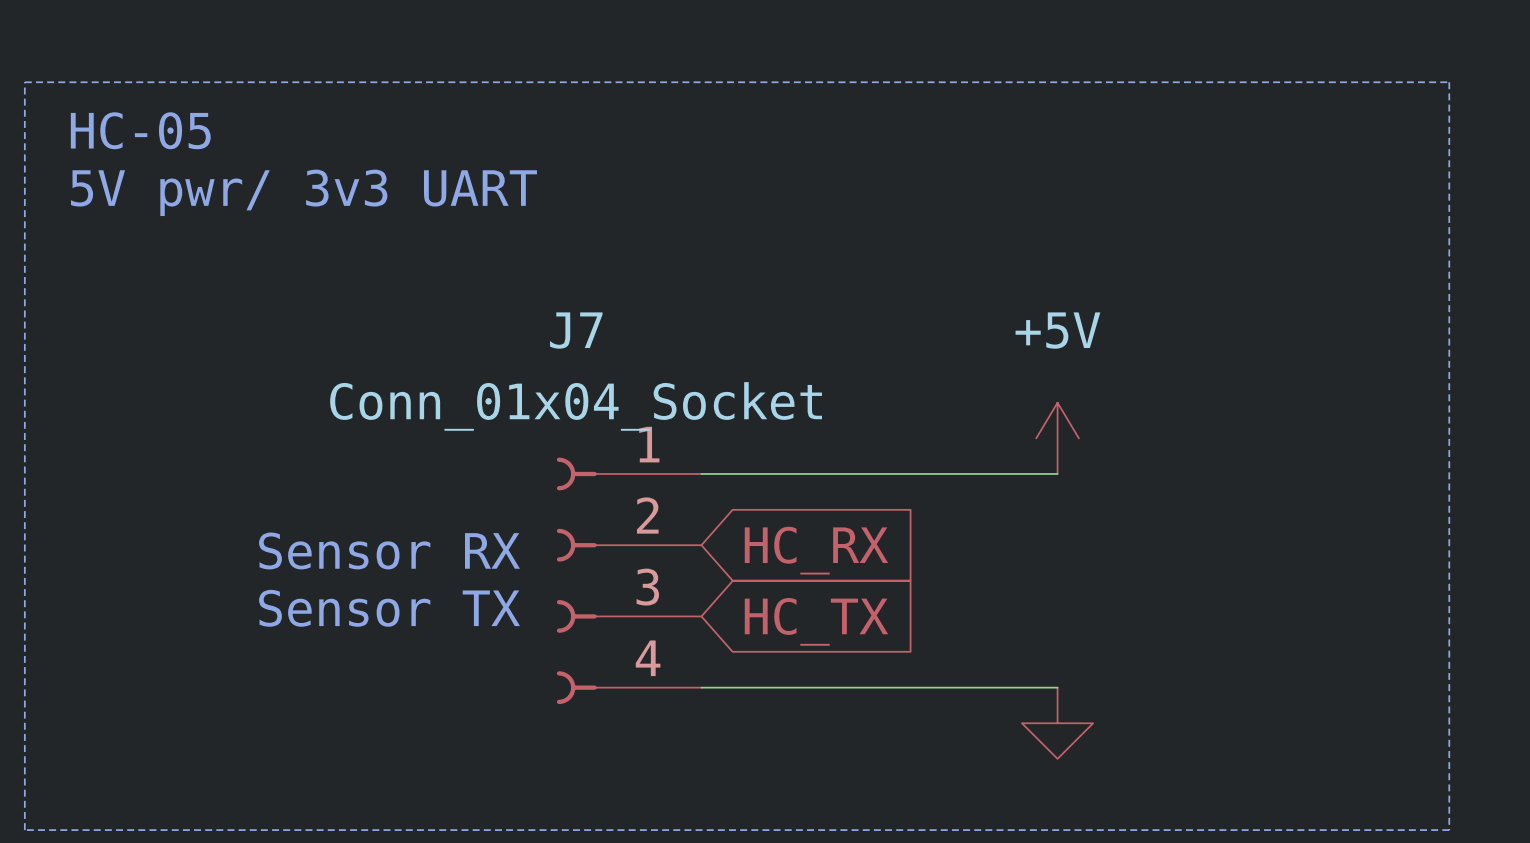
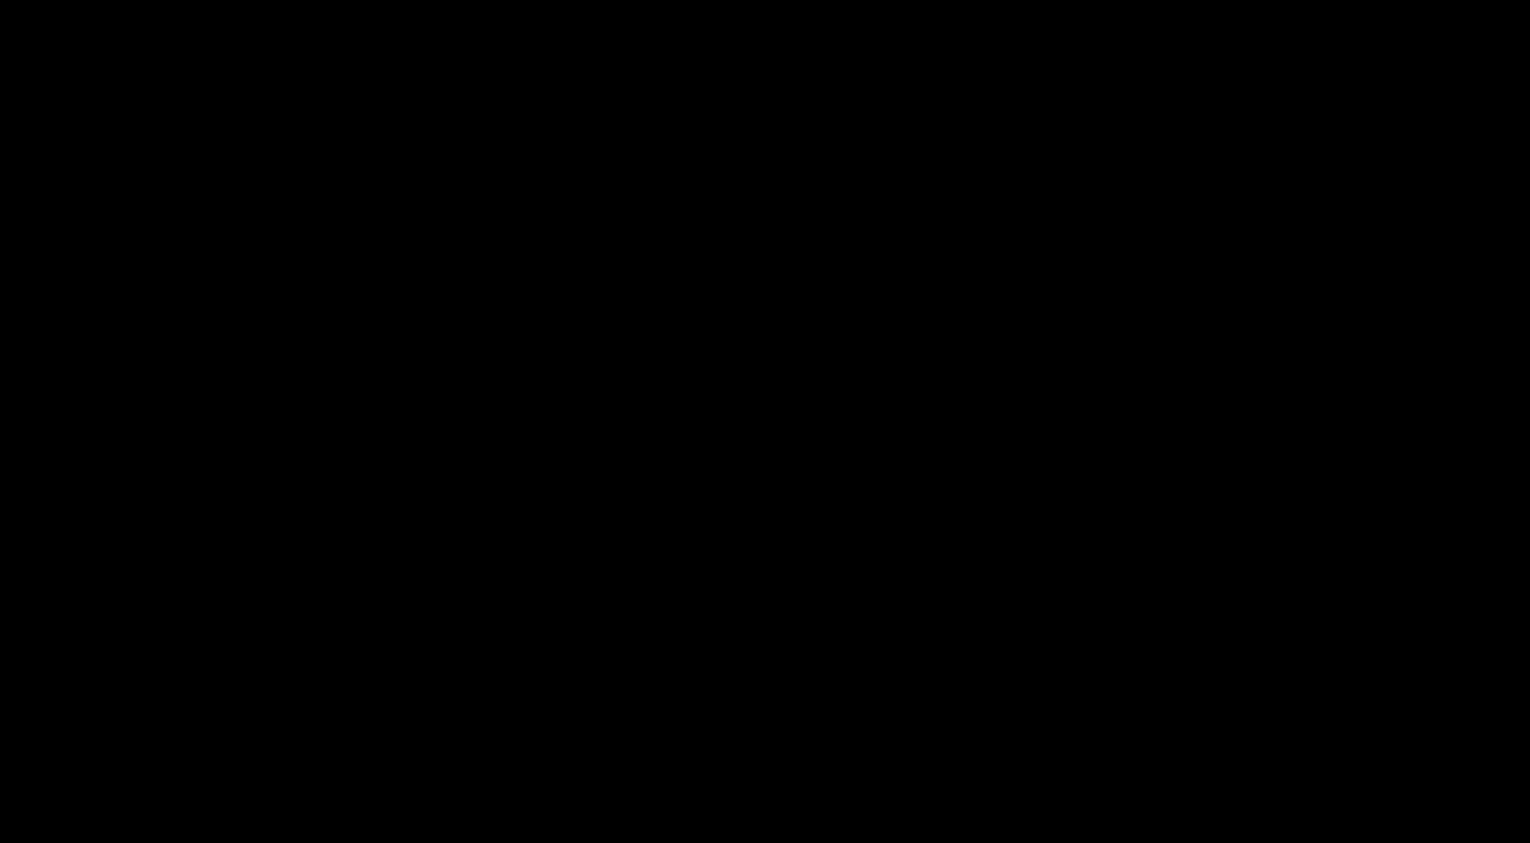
line: (24, 82) (1449, 82) (1449, 830) (24, 830) (24, 82) -> none
text: HC-05 (140, 130) -> none
text: 5V pwr/ 3v3 UART (303, 192) -> none
power symbol: +5V (1057, 438) -> none
wire: (701, 473) (1057, 473) -> none
text: Sensor RX (389, 550) -> none
global label: HC_RX (816, 550) -> none
J7: Conn_01x04_Socket (629, 580) -> none
text: Sensor TX (389, 608) -> none
global label: HC_TX (816, 621) -> none
wire: (701, 687) (1057, 687) -> none
power symbol: (1057, 723) -> none

